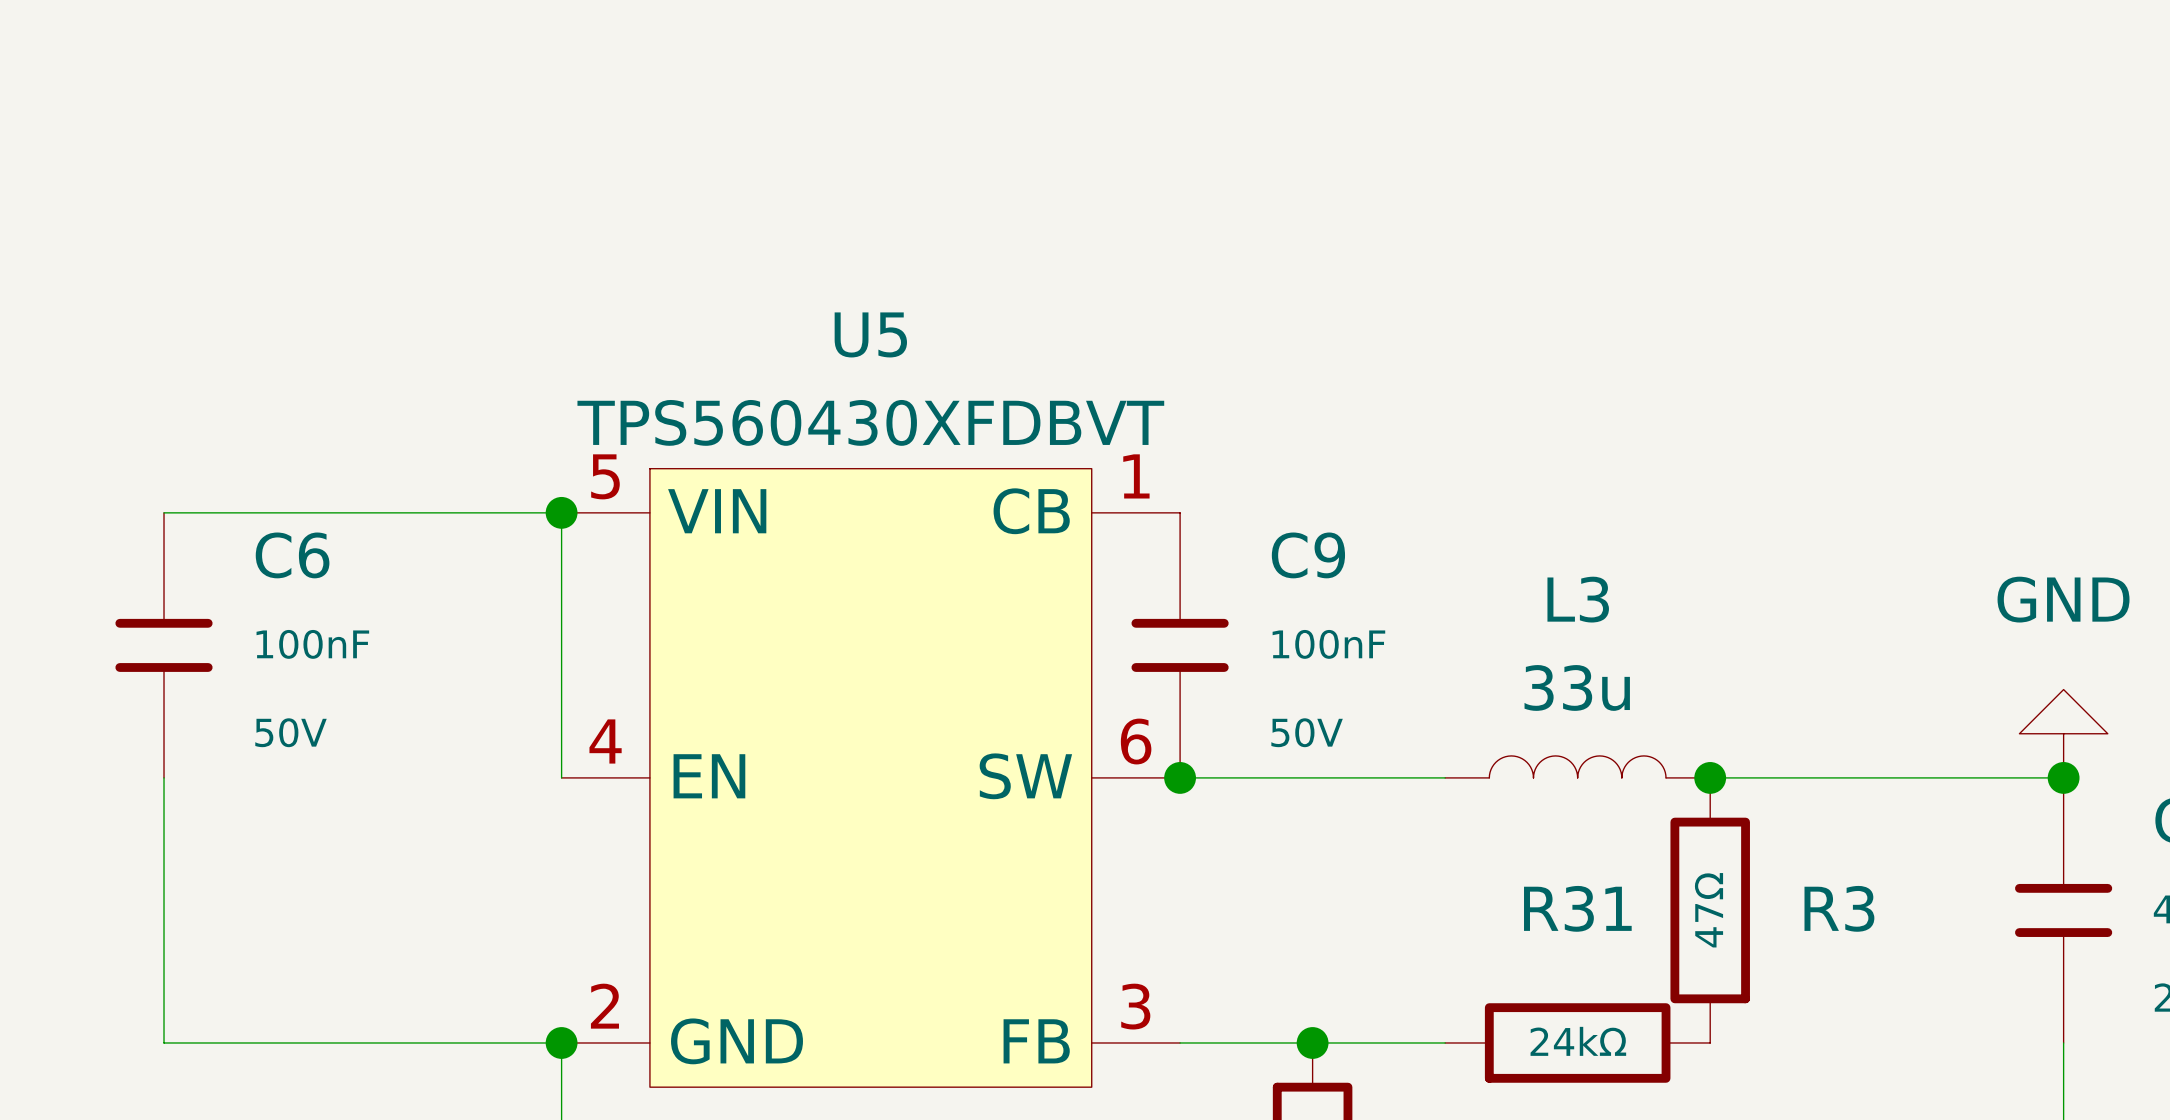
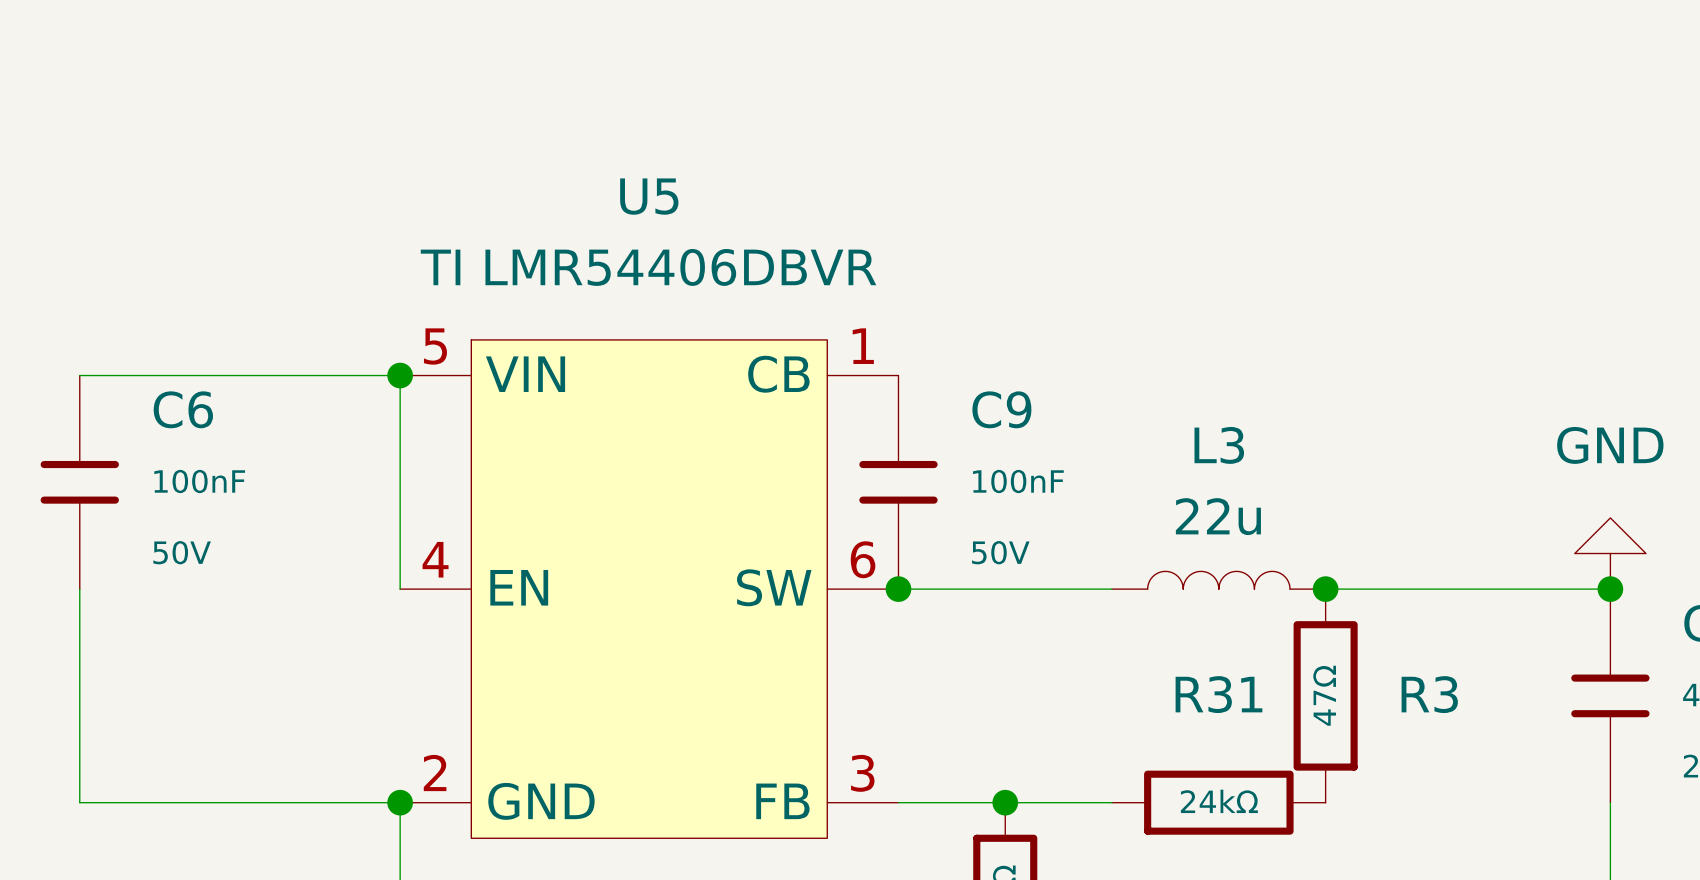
U5 name position: U5 (870, 334) -> U5 (649, 196)
U5 value: TPS560430XFDBVT (870, 422) -> TI LMR54406DBVR (648, 267)
L3 value: 33u (1577, 687) -> 22u (1218, 516)

